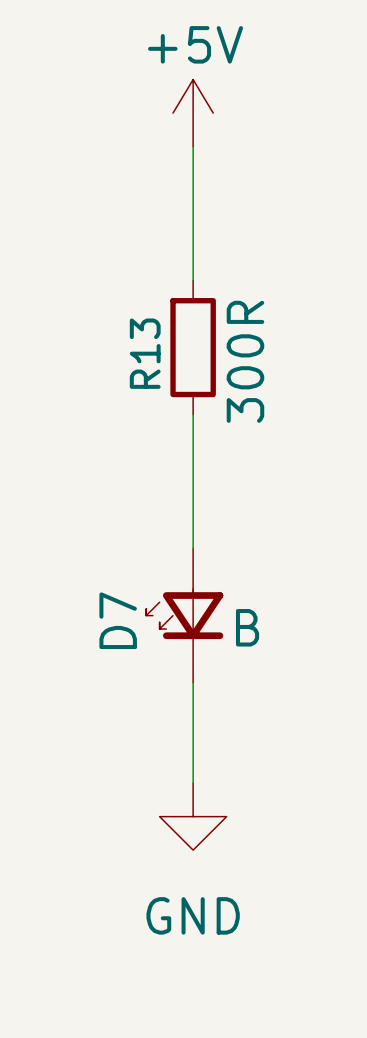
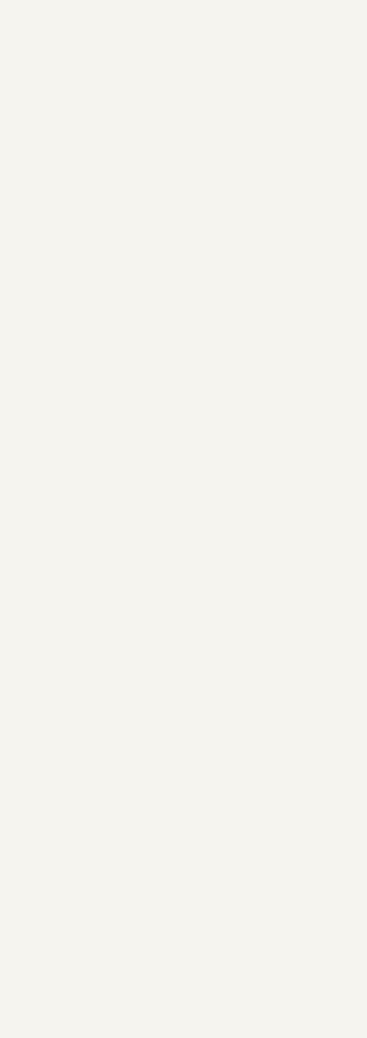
power symbol: +5V (193, 113) -> none
wire: (193, 146) (193, 280) -> none
R13: 300R (193, 347) -> none
wire: (193, 414) (193, 548) -> none
D7: B (184, 615) -> none
wire: (193, 682) (193, 783) -> none
power symbol: GND (193, 816) -> none

